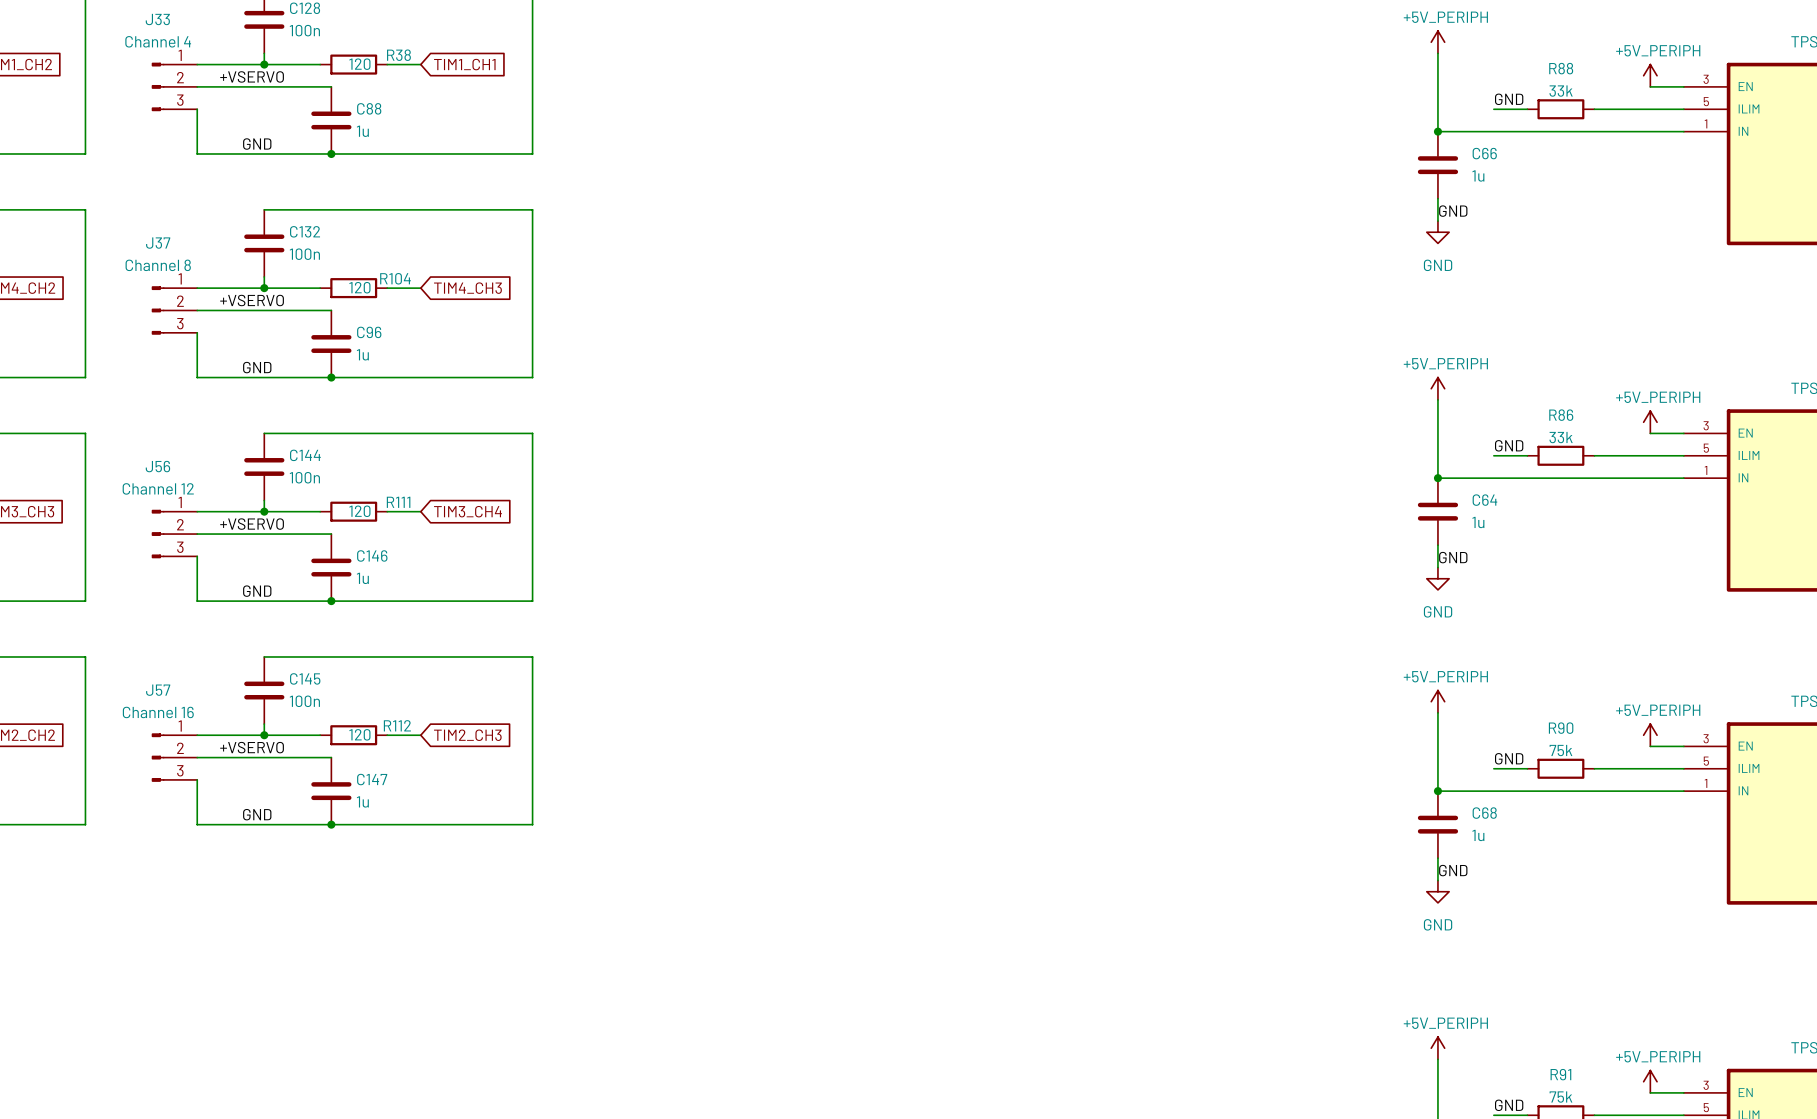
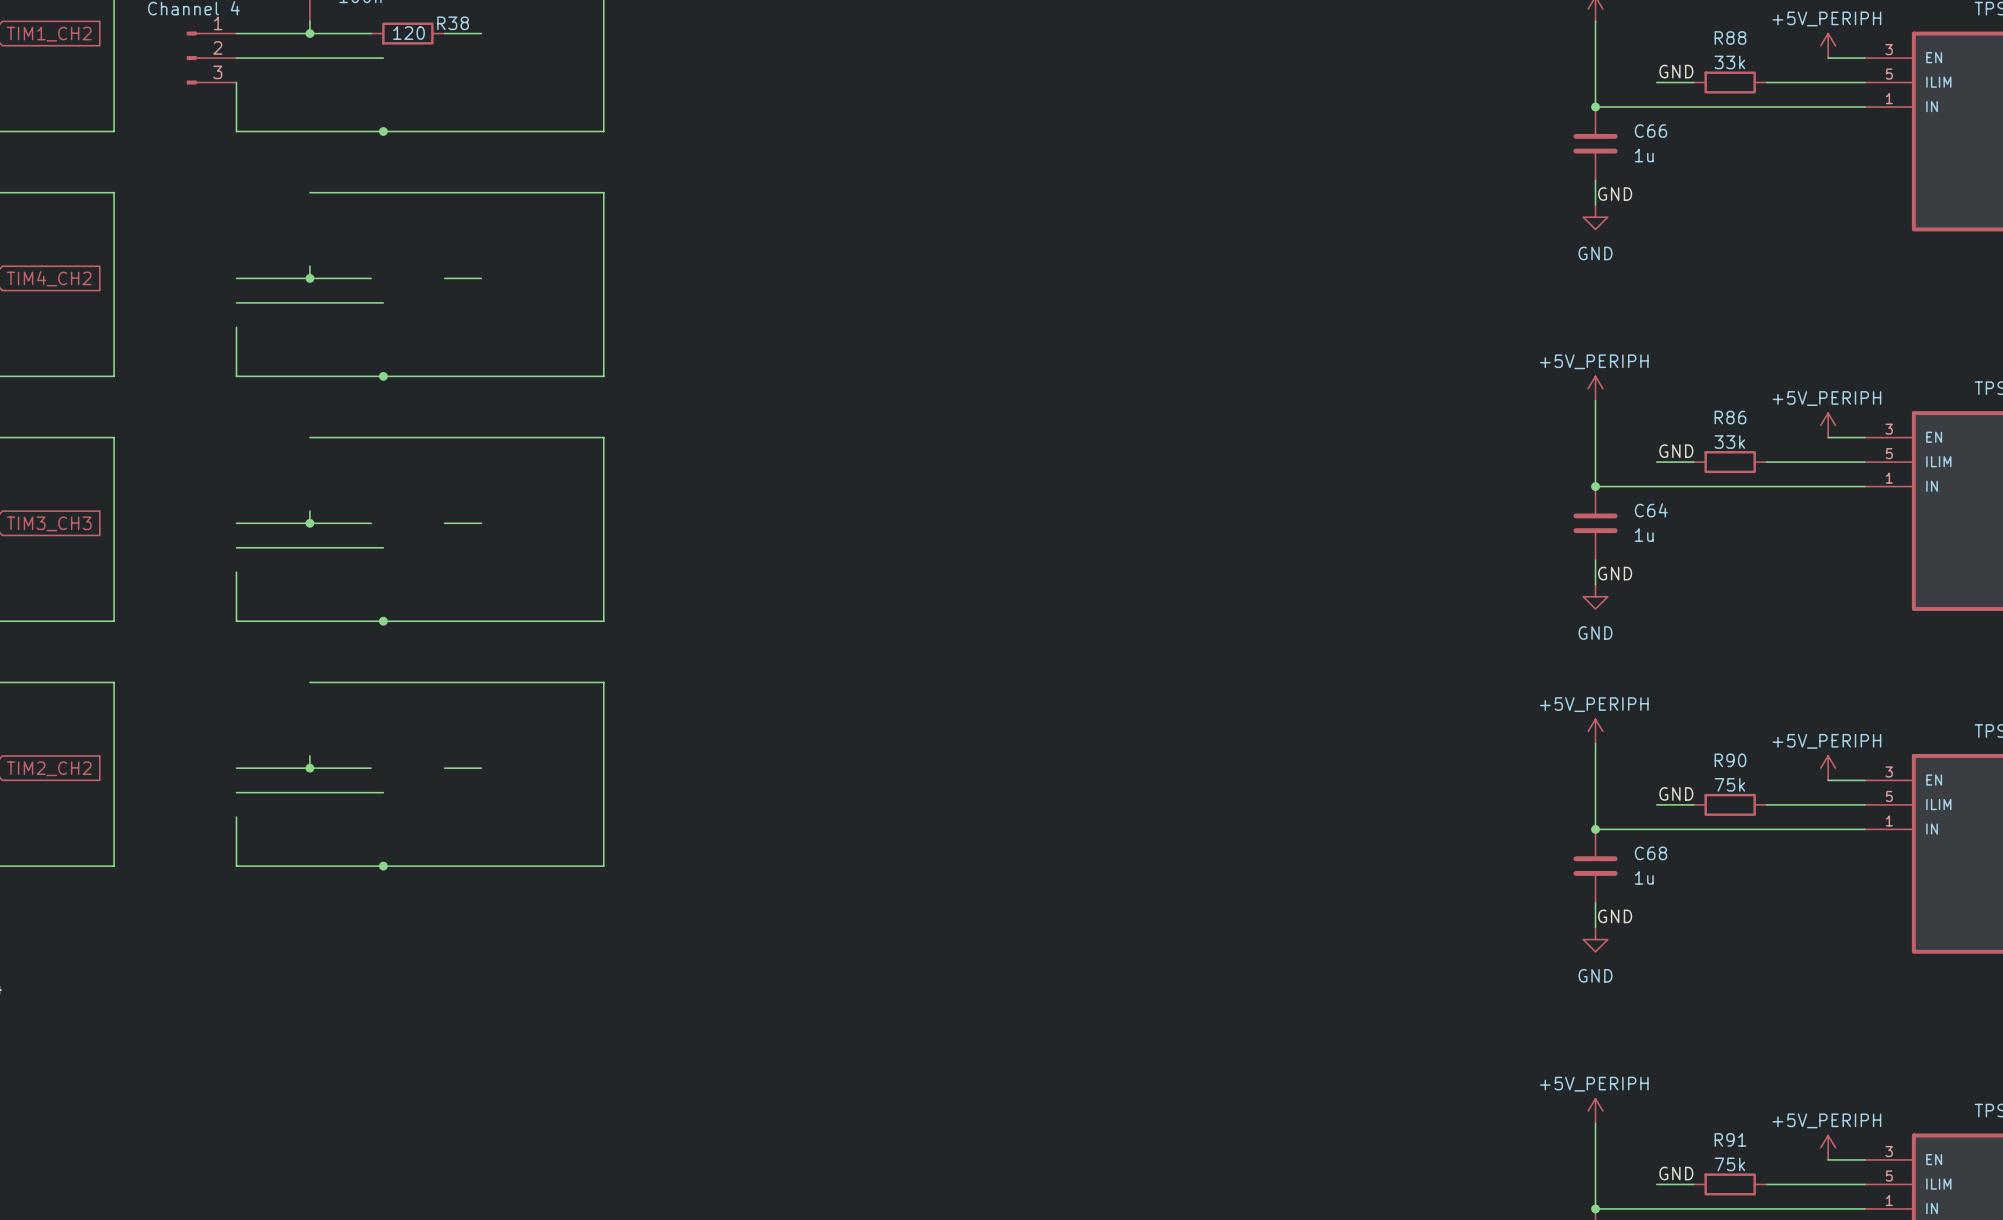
global label: TIM1_CH1 (464, 64) -> none
label: +VSERVO (252, 76) -> none
C88: 1u (331, 120) -> none
label: GND (257, 144) -> none
C132: 100n (264, 243) -> none
R104: 120 (353, 288) -> none
global label: TIM4_CH3 (467, 288) -> none
label: +VSERVO (252, 300) -> none
J37: Channel 8 (174, 310) -> none
C96: 1u (331, 344) -> none
label: GND (257, 367) -> none
C144: 100n (264, 466) -> none
R111: 120 (353, 511) -> none
global label: TIM3_CH4 (467, 511) -> none
label: +VSERVO (252, 524) -> none
J56: Channel 12 (174, 534) -> none
C146: 1u (331, 567) -> none
label: GND (257, 591) -> none
C145: 100n (264, 690) -> none
R112: 120 (353, 735) -> none
global label: TIM2_CH3 (467, 735) -> none
label: +VSERVO (252, 747) -> none
J57: Channel 16 (174, 757) -> none
C147: 1u (331, 791) -> none
label: GND (257, 814) -> none

